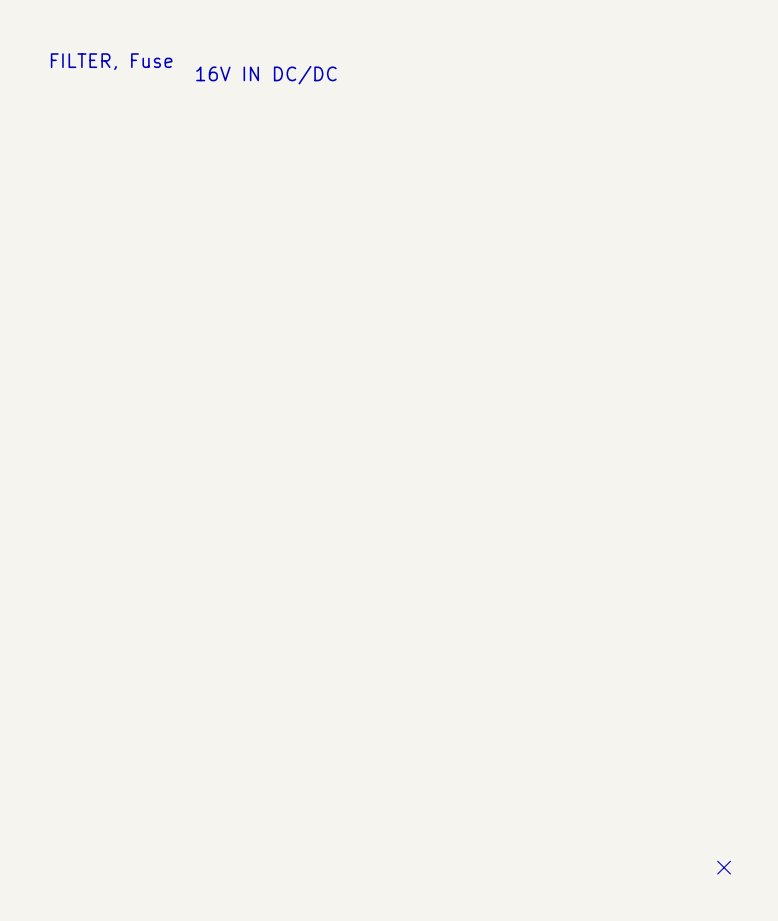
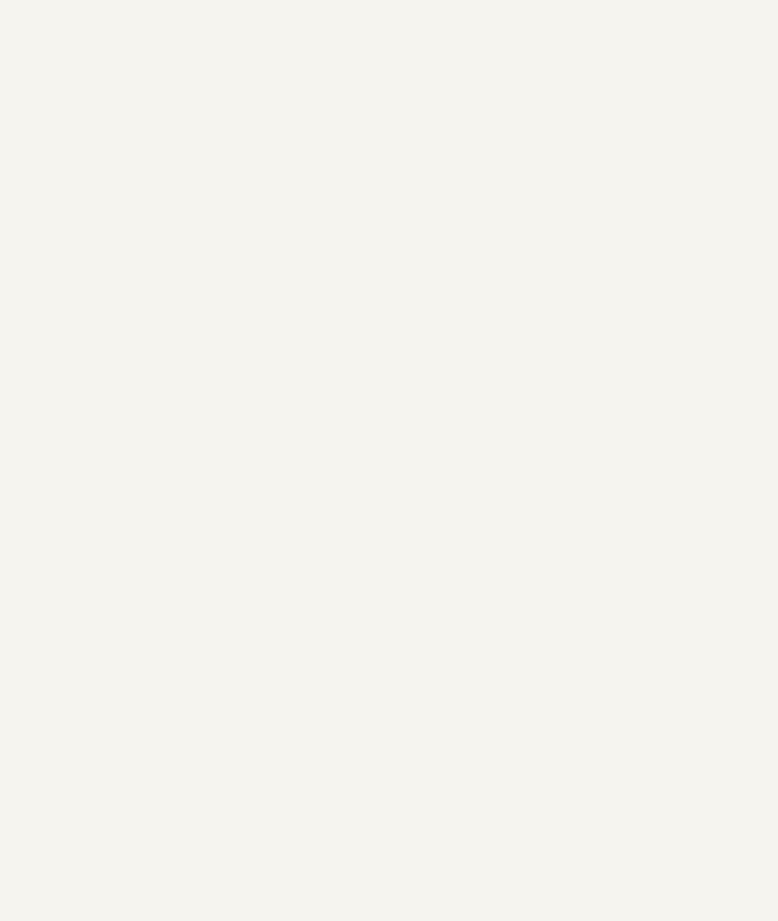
text: FILTER, Fuse (111, 61) -> none
text: 16V IN DC/DC (266, 75) -> none
no-connect mark: (724, 867) -> none

